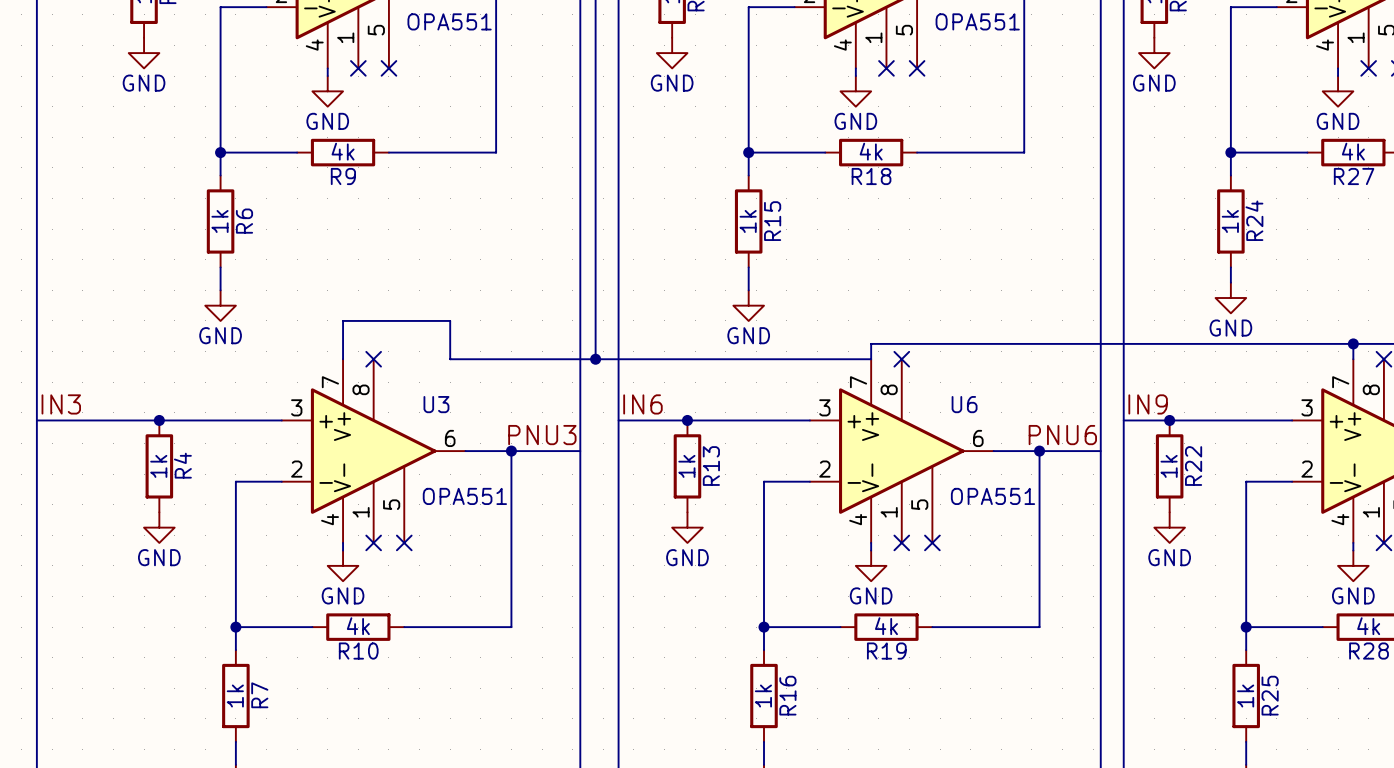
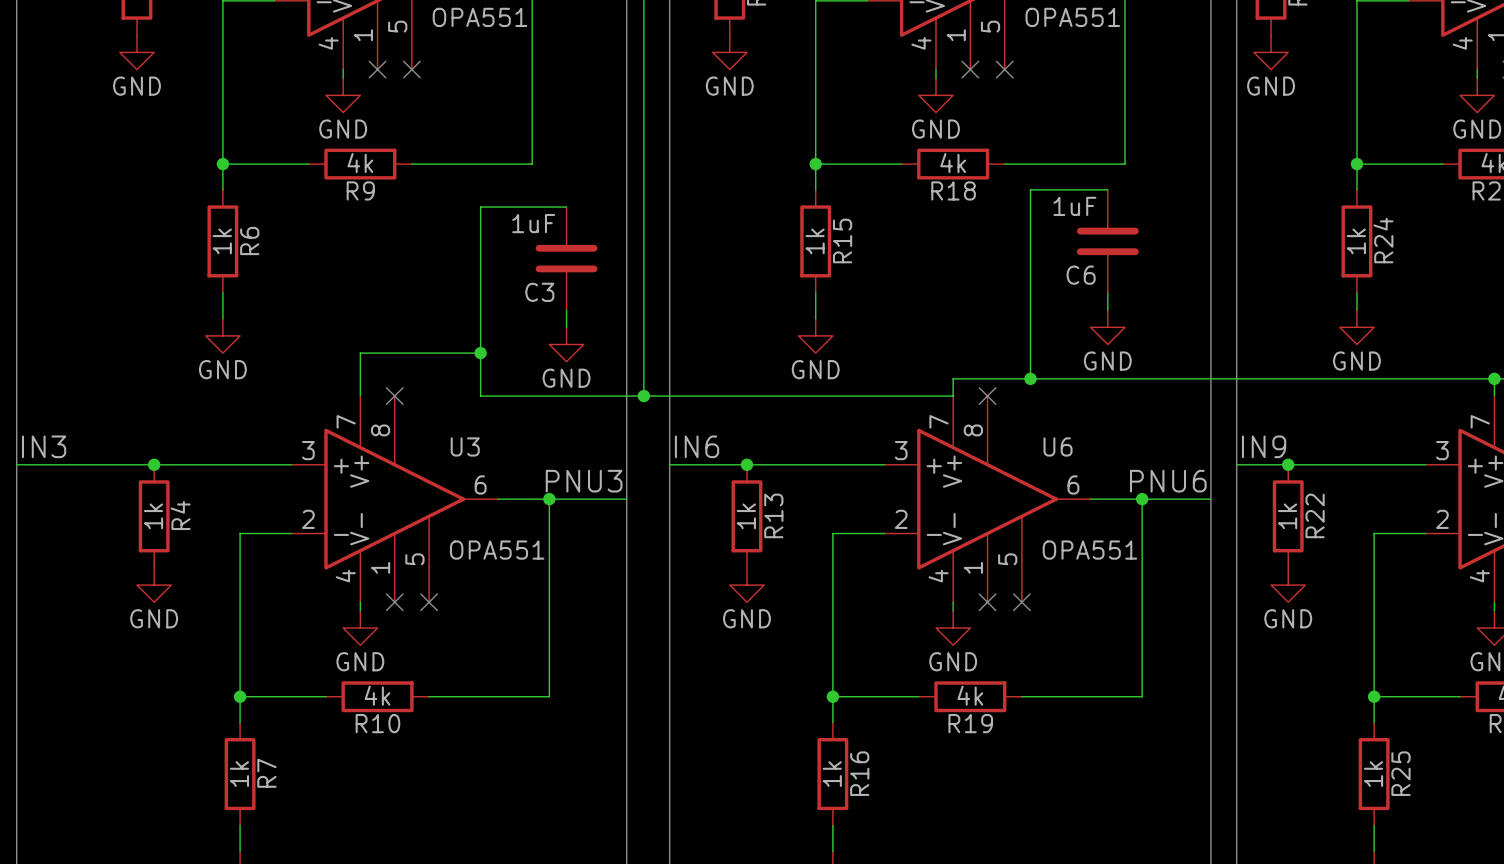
wire: none -> (1107, 189) (1030, 189) (1030, 378)
wire: none -> (566, 207) (480, 207) (480, 353)
C6: none -> 1uF (1107, 241)
C3: none -> 1uF (566, 258)
wire: none -> (1107, 292) (1107, 310)
wire: none -> (566, 310) (566, 327)
power symbol: none -> GND (1107, 327)
power symbol: none -> GND (566, 344)
junction: none -> (480, 353)
junction: none -> (1030, 378)

